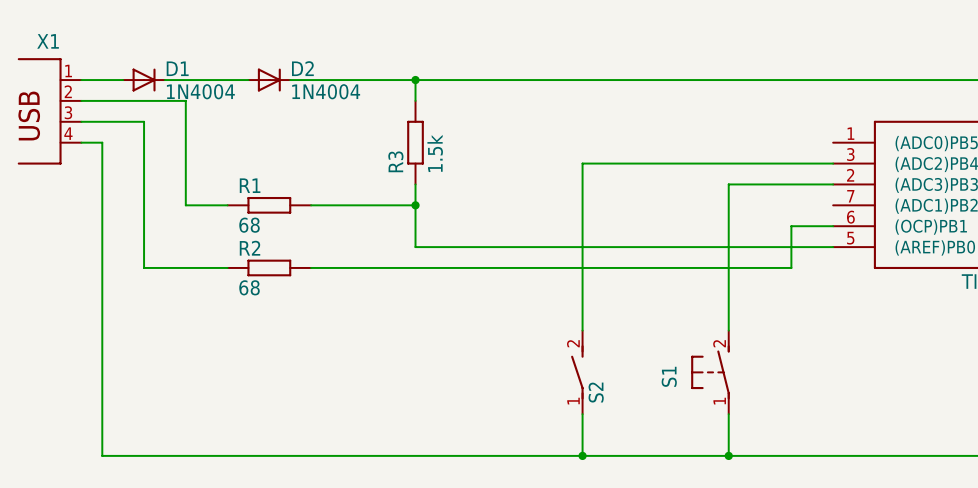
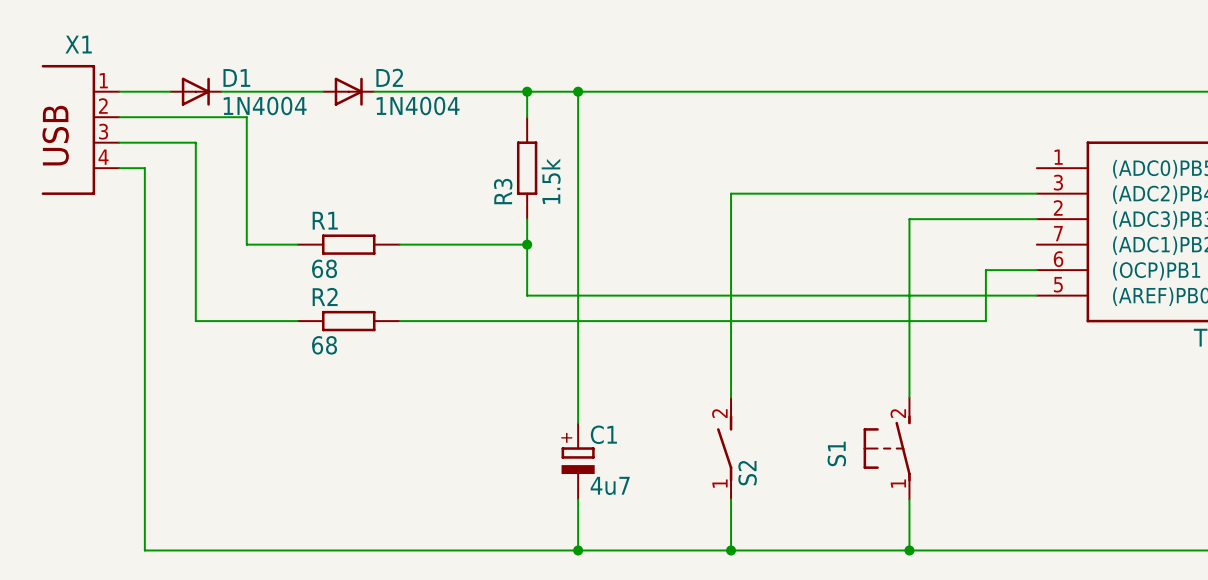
wire: none -> (578, 91) (578, 423)
junction: none -> (578, 91)
C1: none -> 4u7 (578, 461)
wire: none -> (578, 499) (578, 550)
junction: none -> (578, 550)

